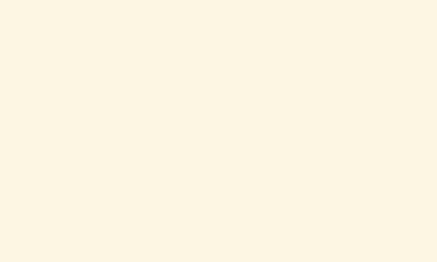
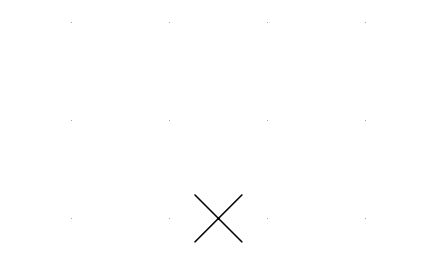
no-connect mark: none -> (218, 218)

